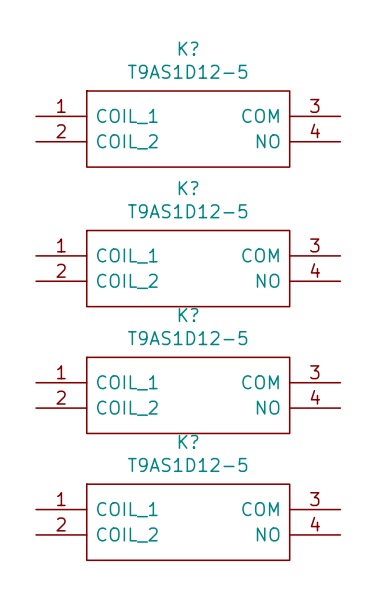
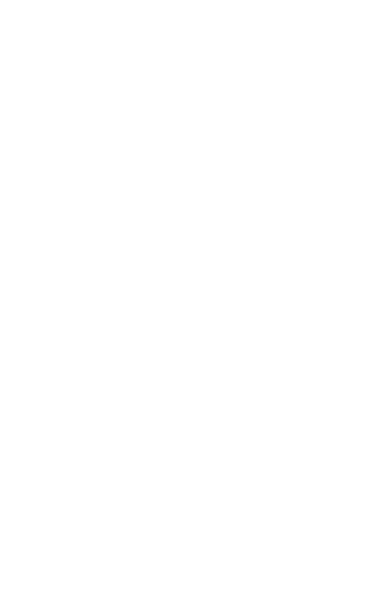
K?: T9AS1D12-5 (188, 129) -> none
K?: T9AS1D12-5 (188, 268) -> none
K?: T9AS1D12-5 (188, 395) -> none
K?: T9AS1D12-5 (188, 522) -> none

